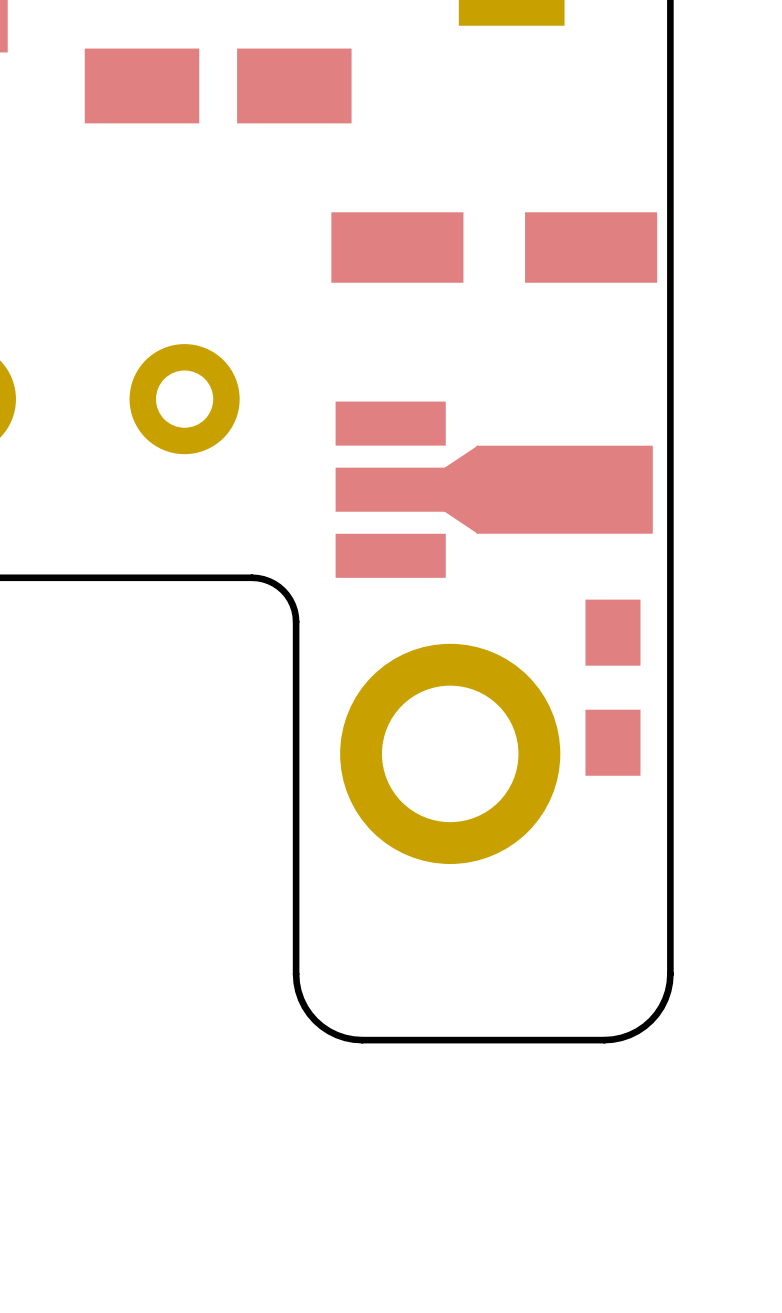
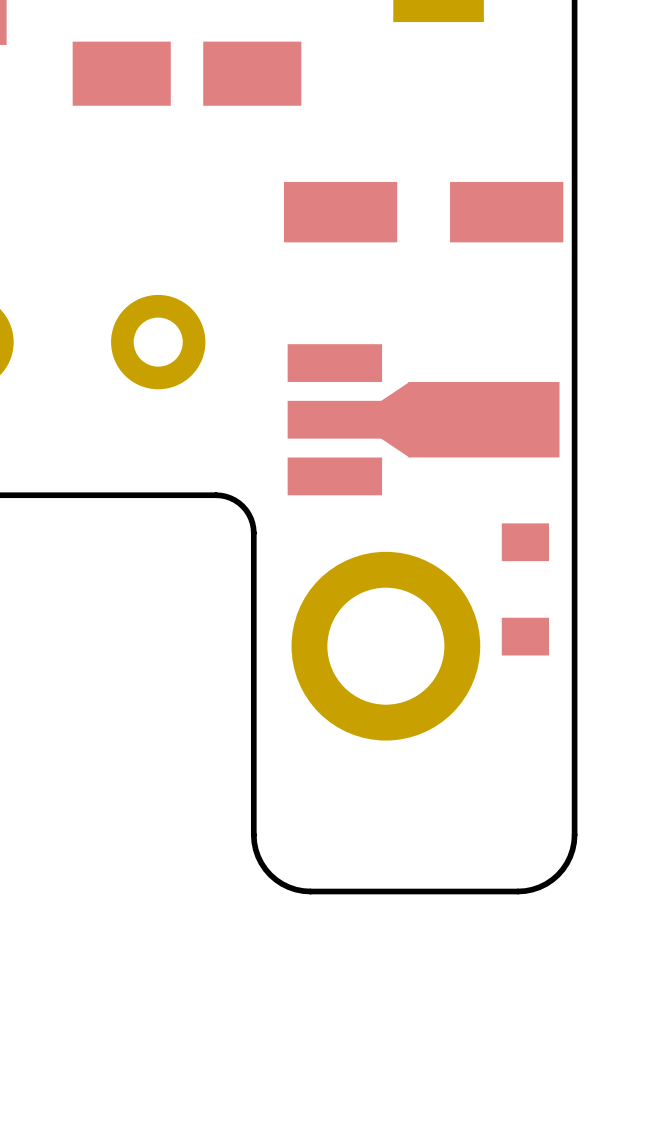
part footprint: [585, 599, 641, 776] -> [501, 523, 549, 656]

